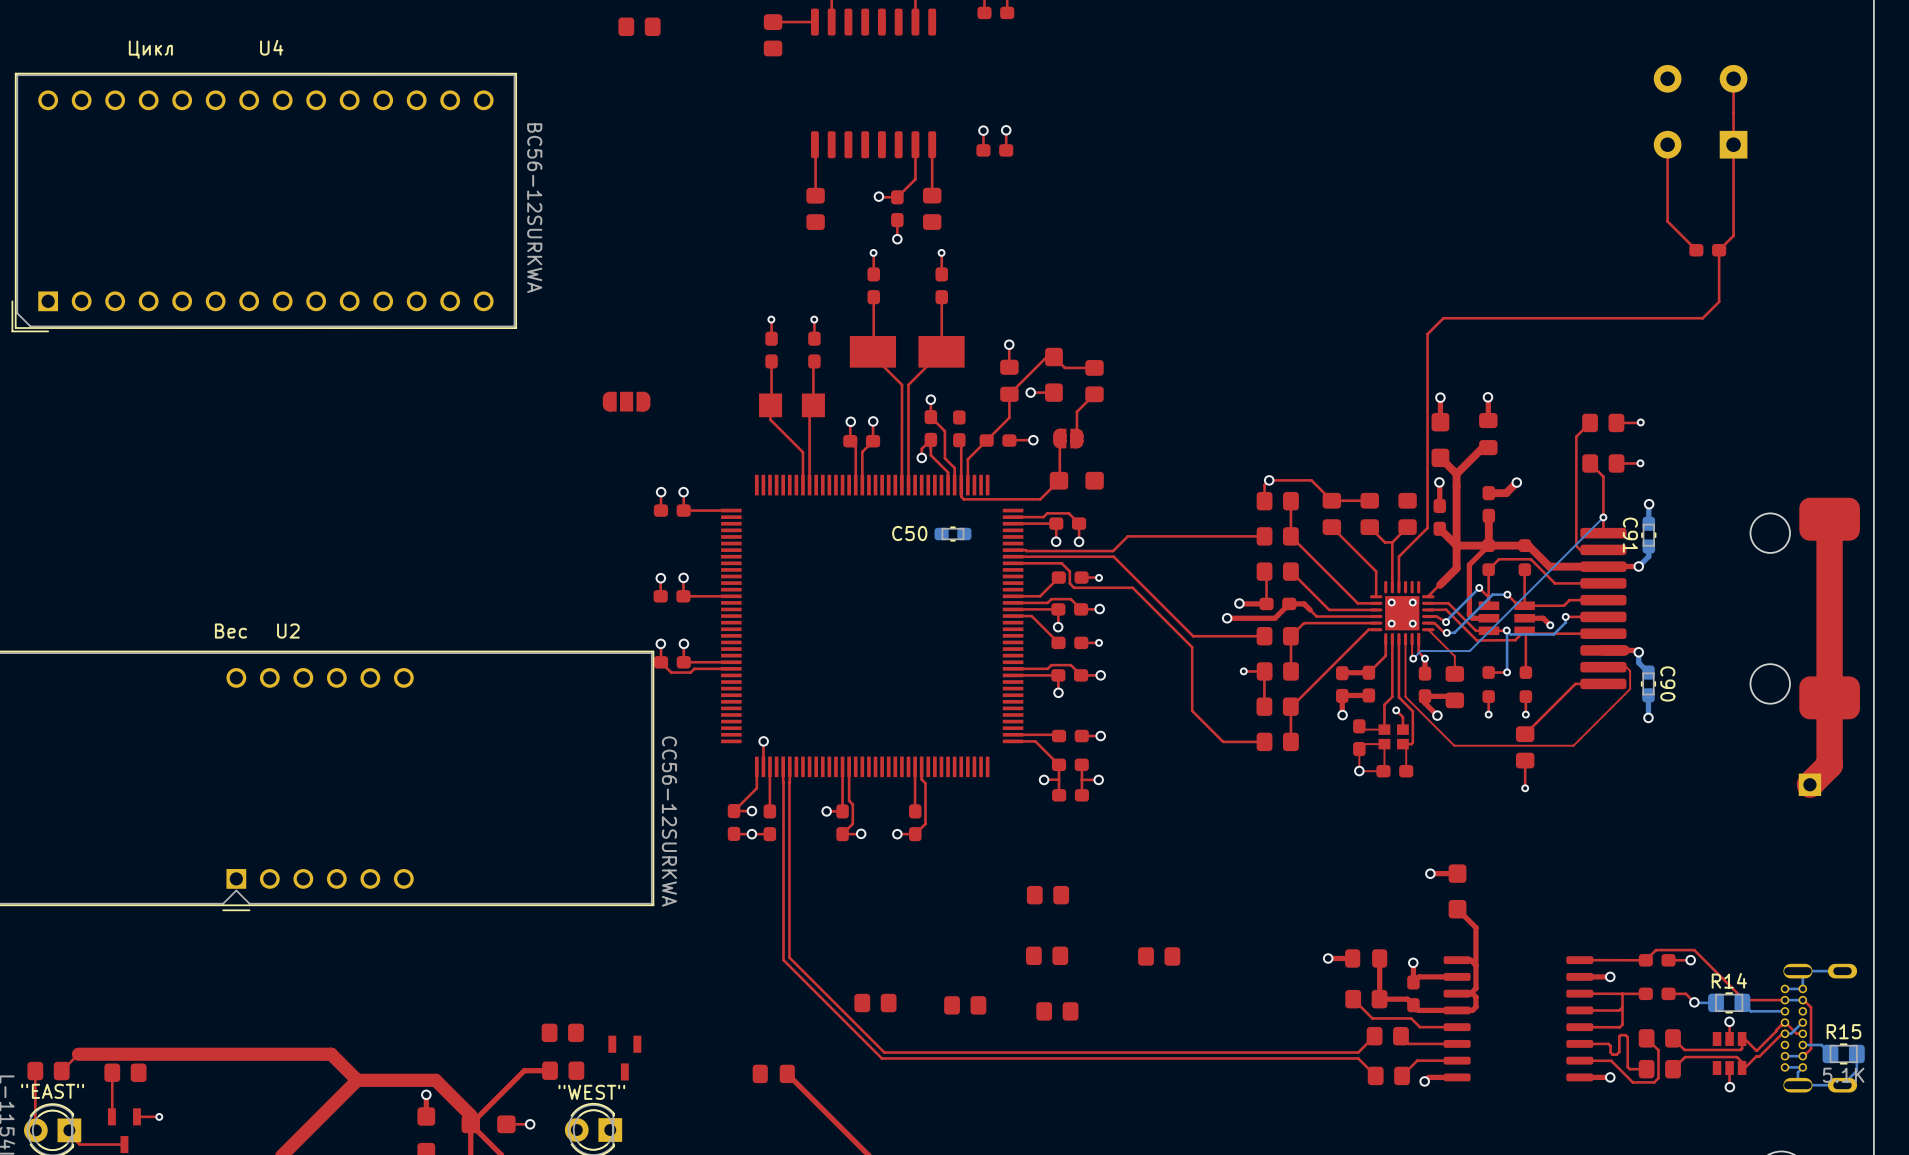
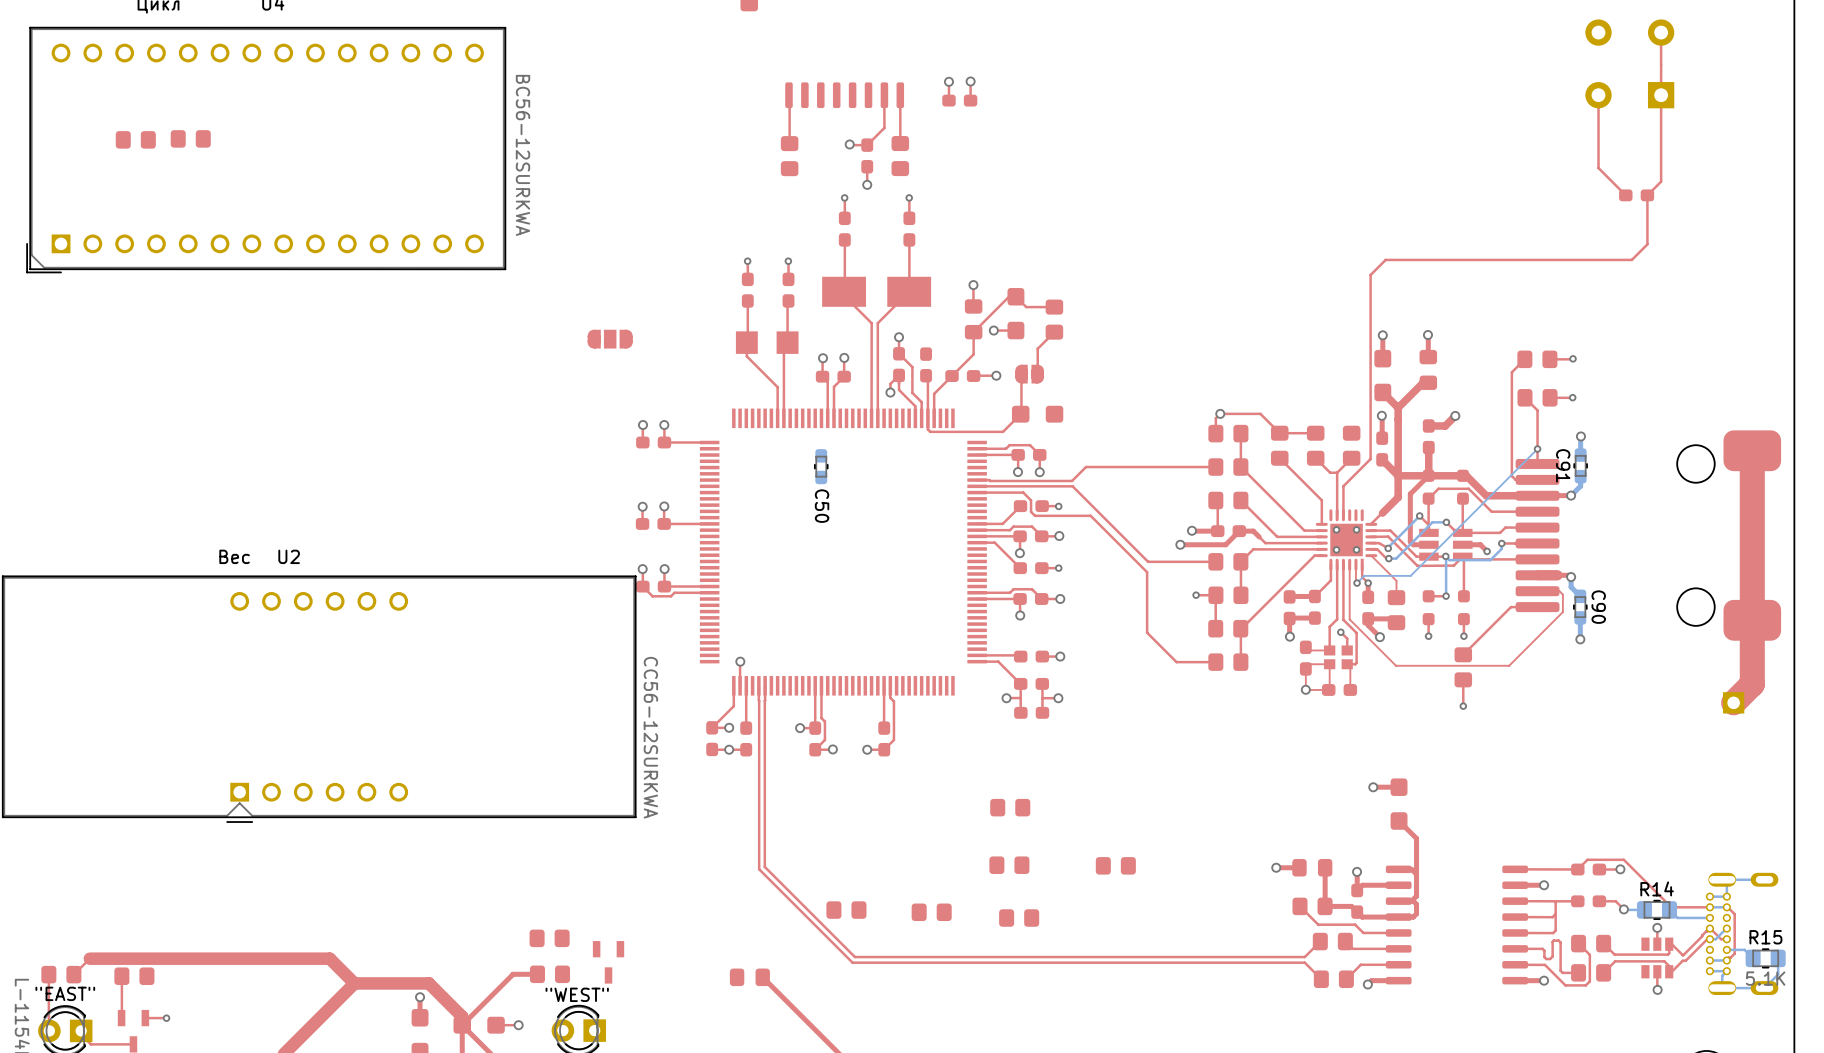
part: none -> (190, 138)
part: none -> (135, 139)
C50 name position: C50 (909, 533) -> C50 (822, 506)
C50 rotation: 0° (952, 534) -> 90° clockwise (821, 466)
C50 position: (952, 534) -> (821, 466)

